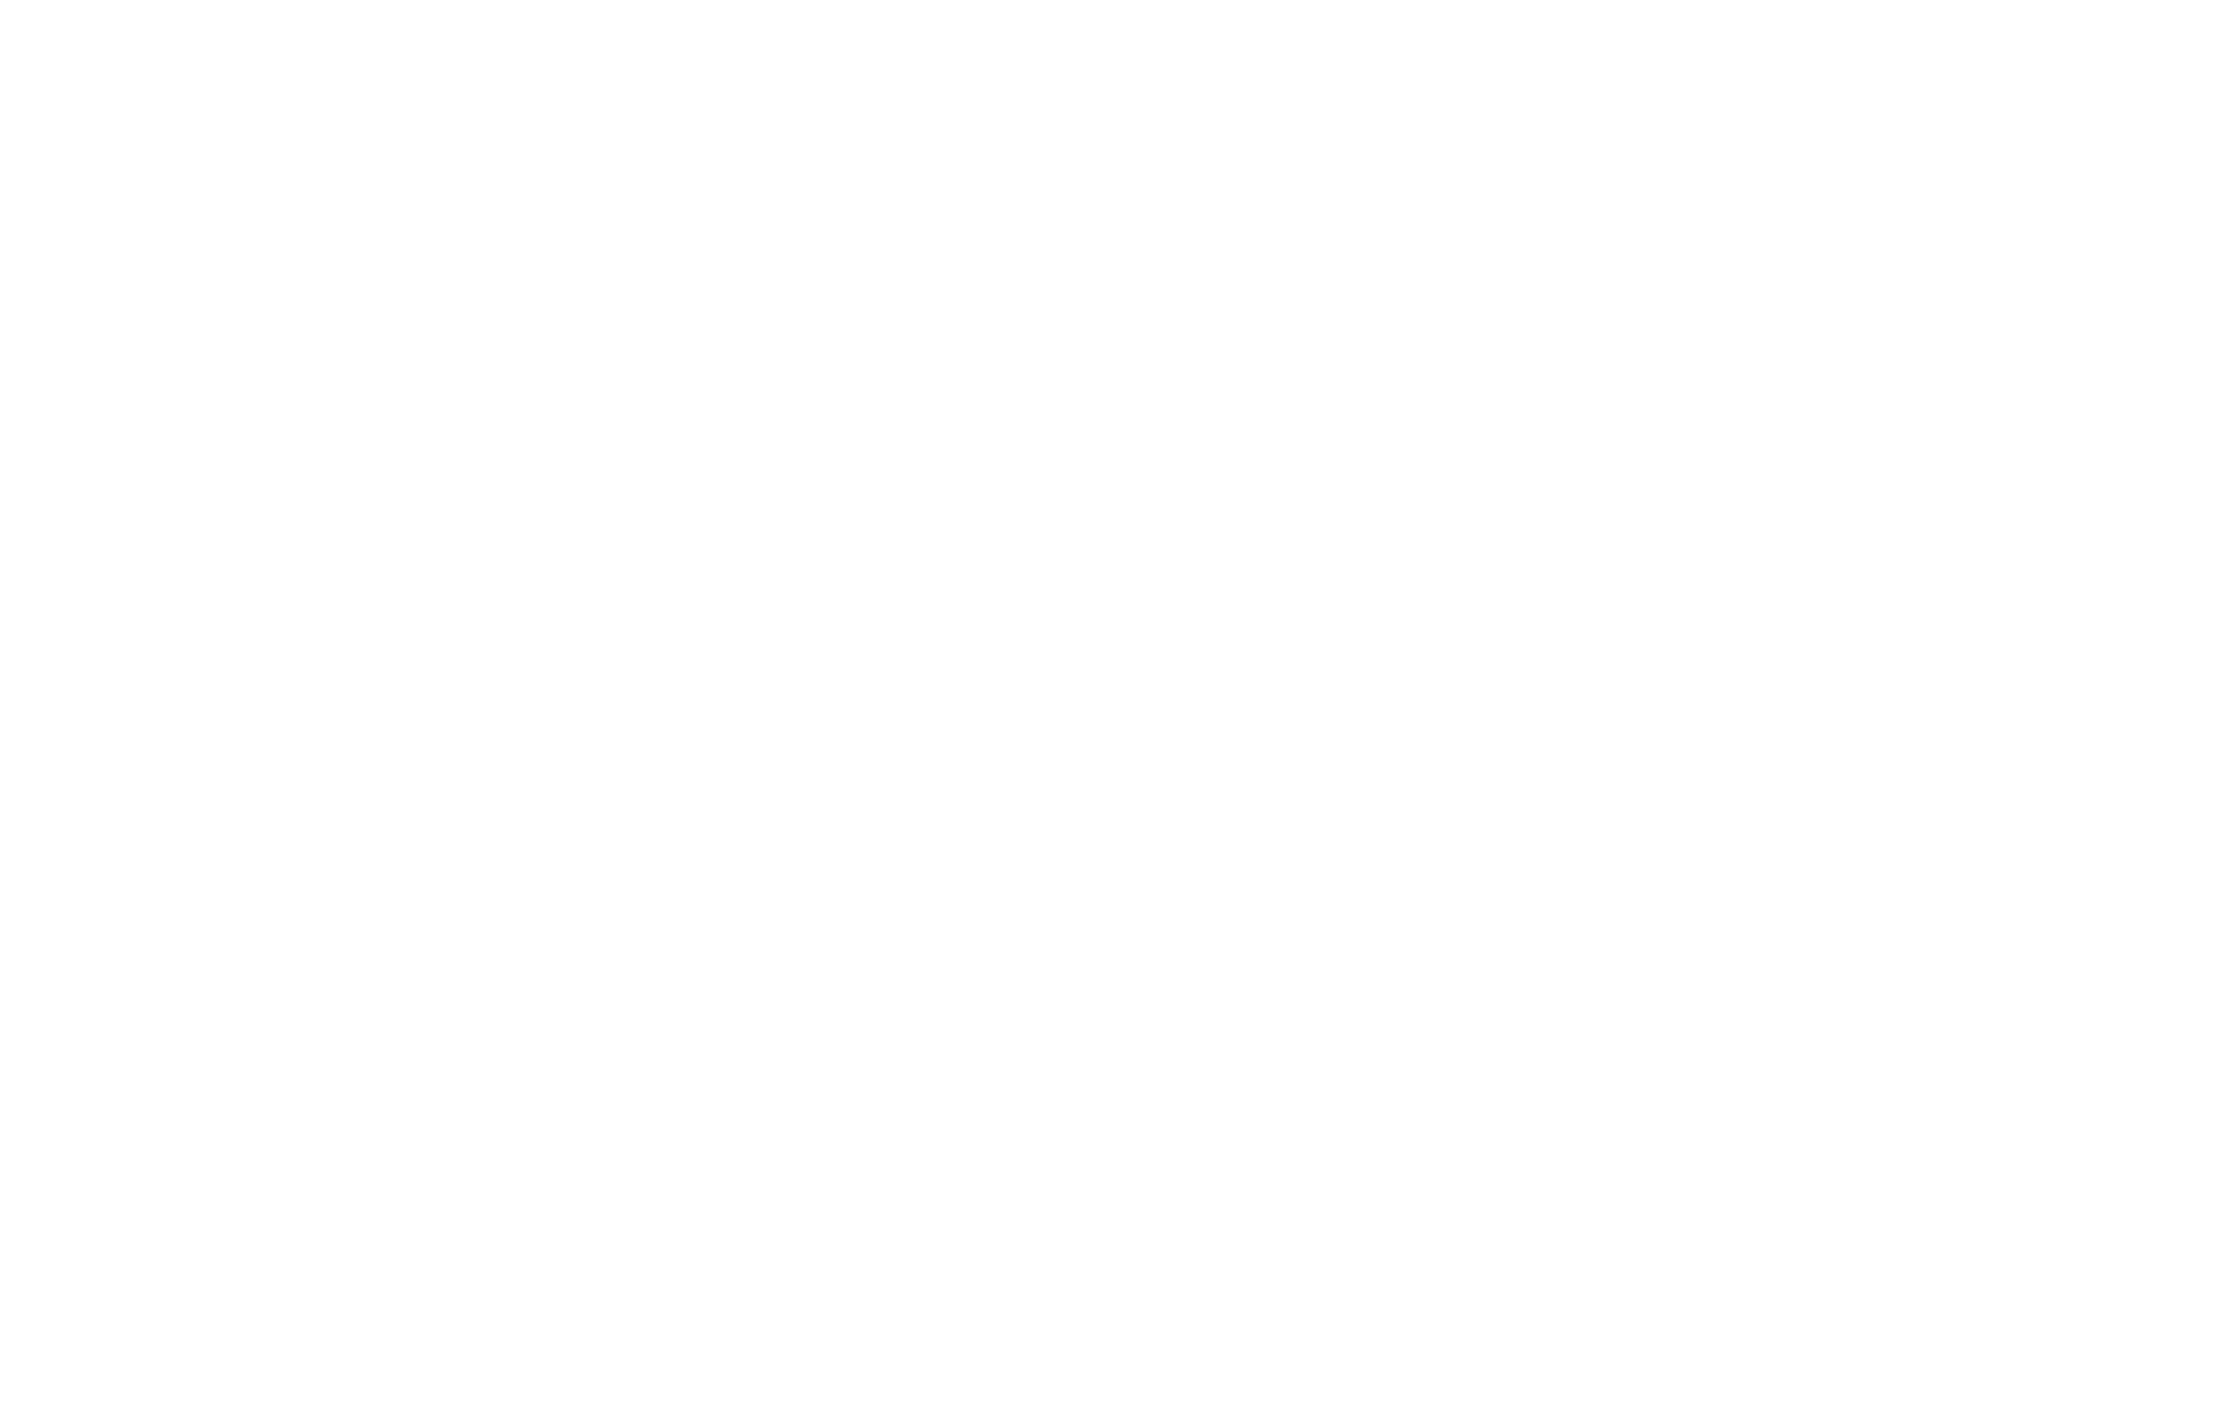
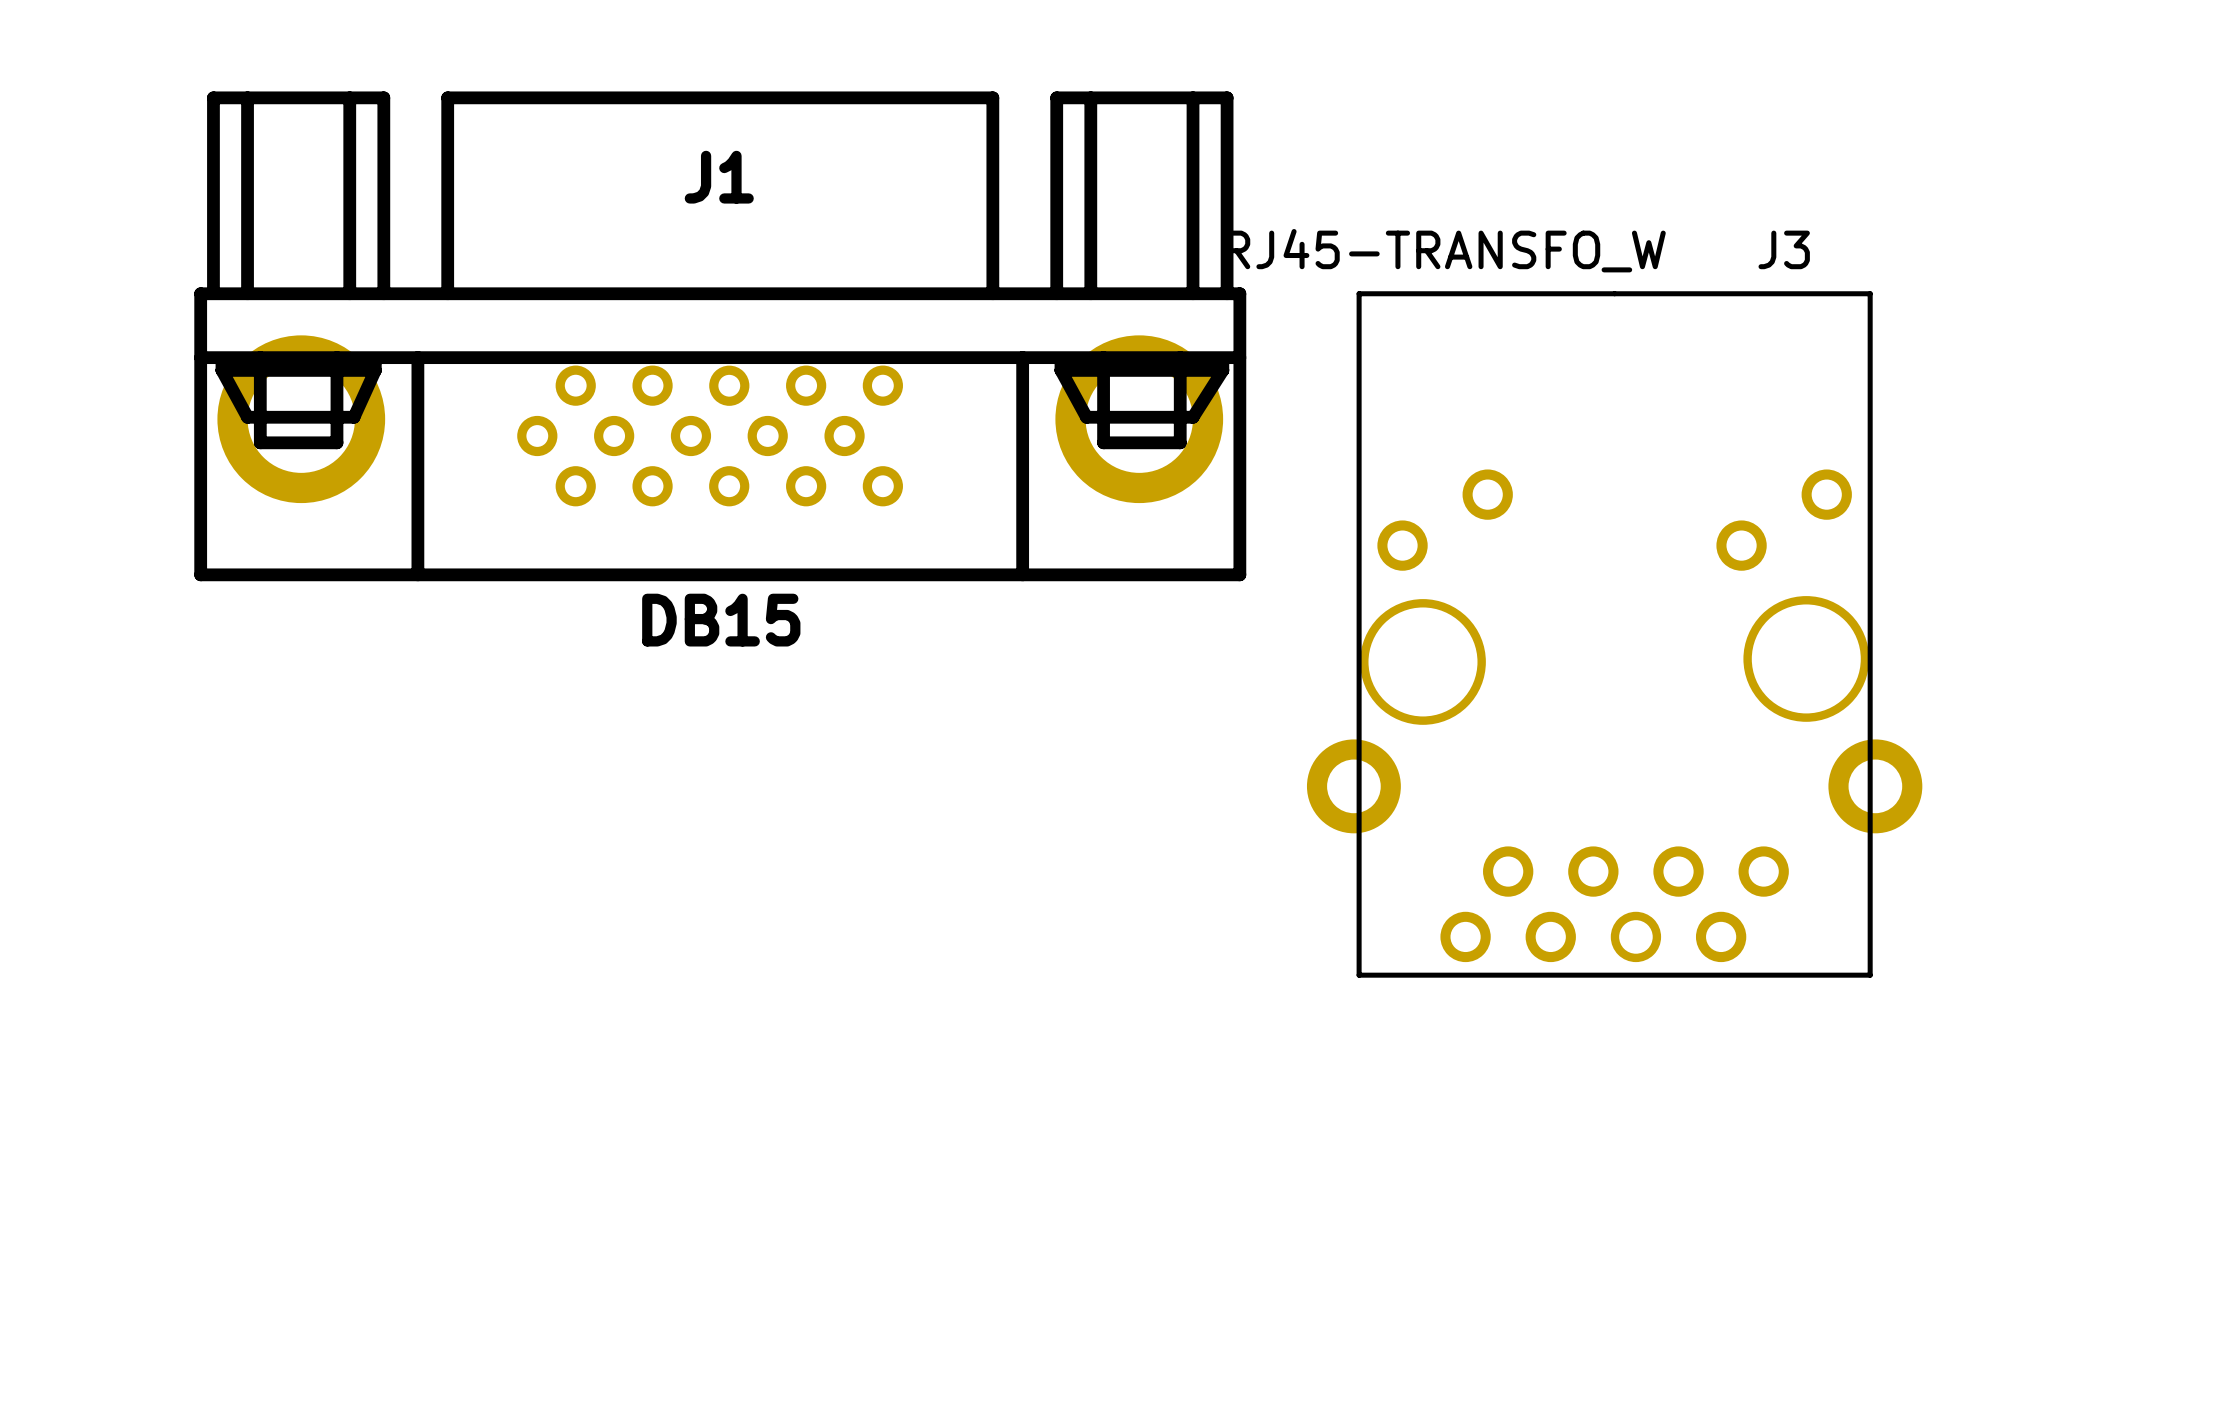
J1: none -> DB15 (720, 336)
J3: none -> RJ45-TRANSFO_W (1614, 634)

